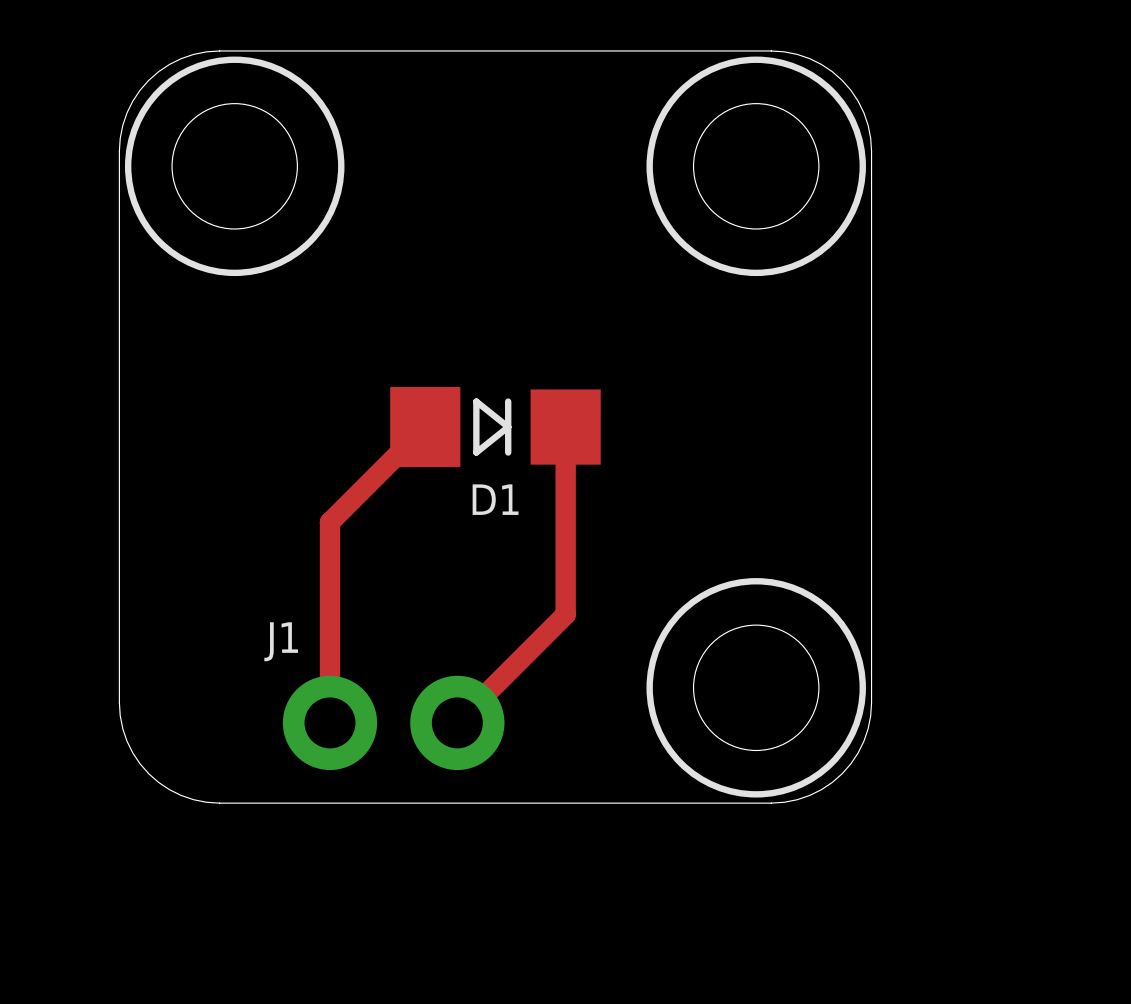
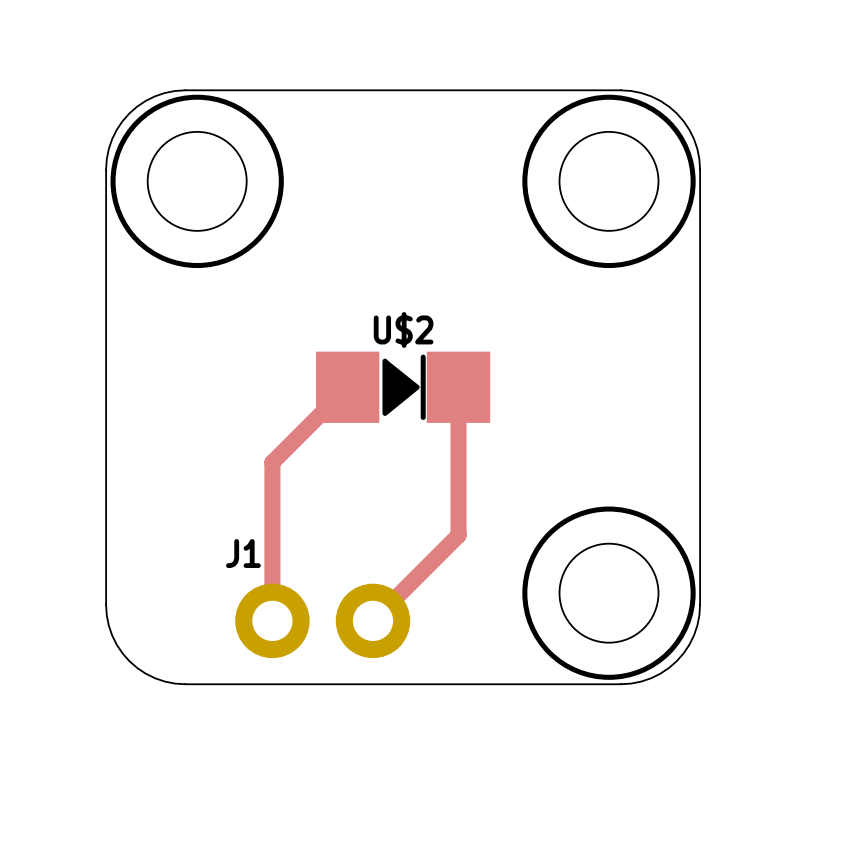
D1: (495, 427) -> none
U$2: none -> (403, 387)

